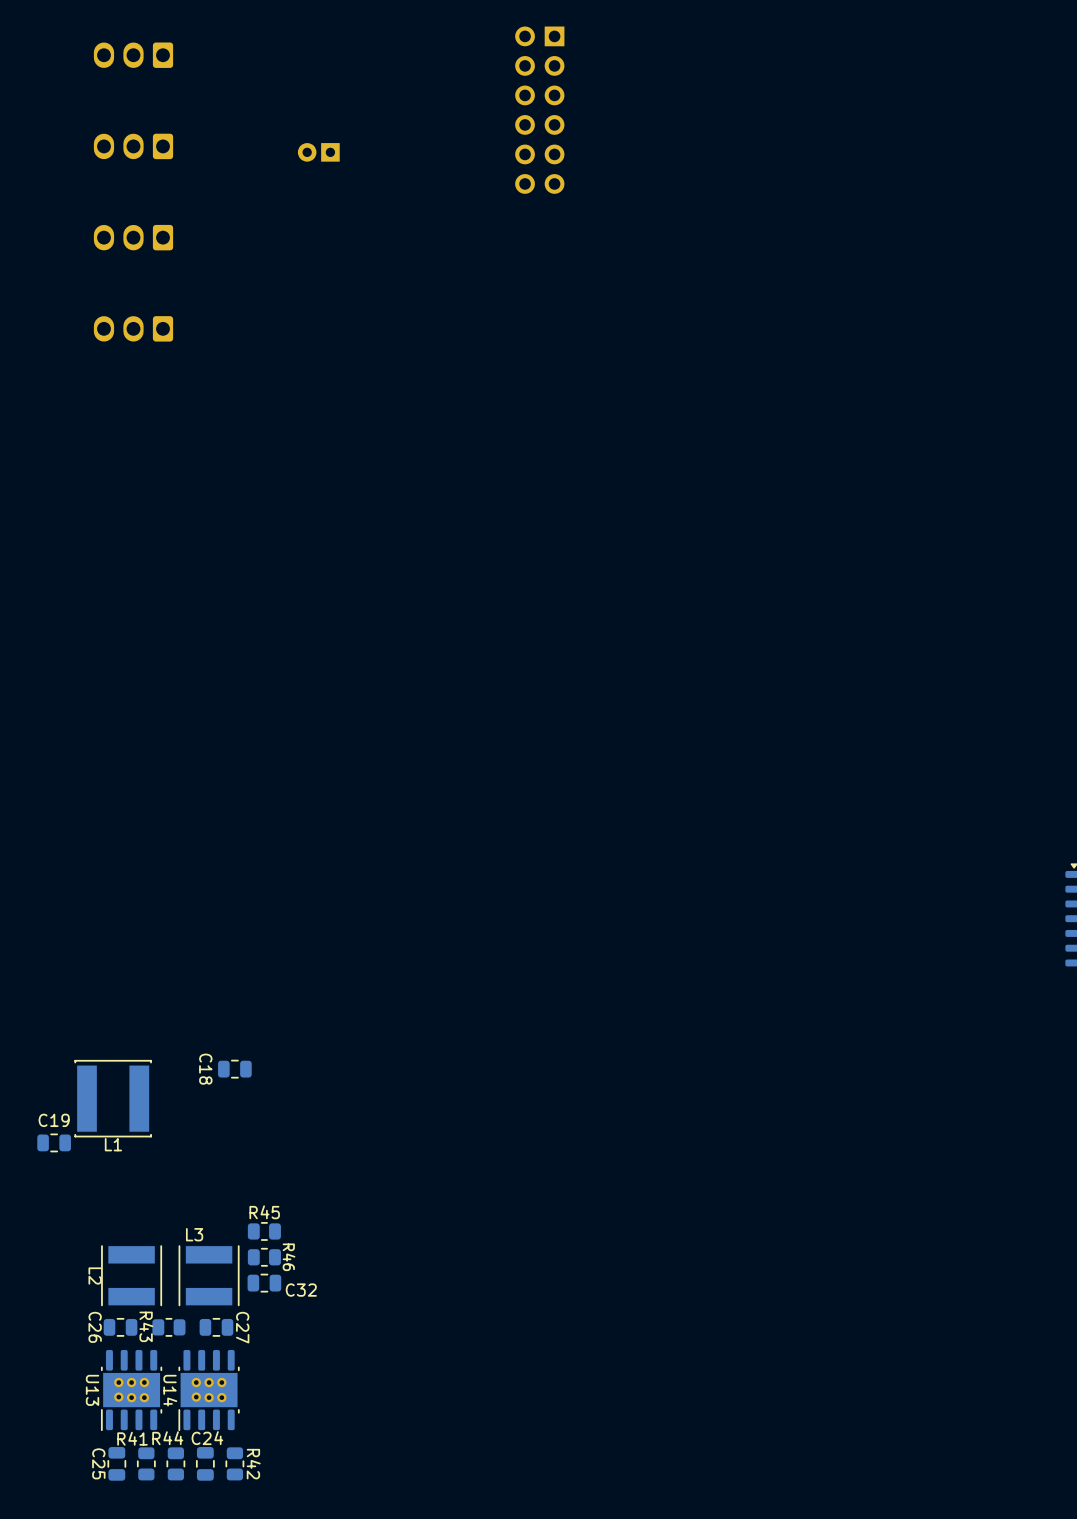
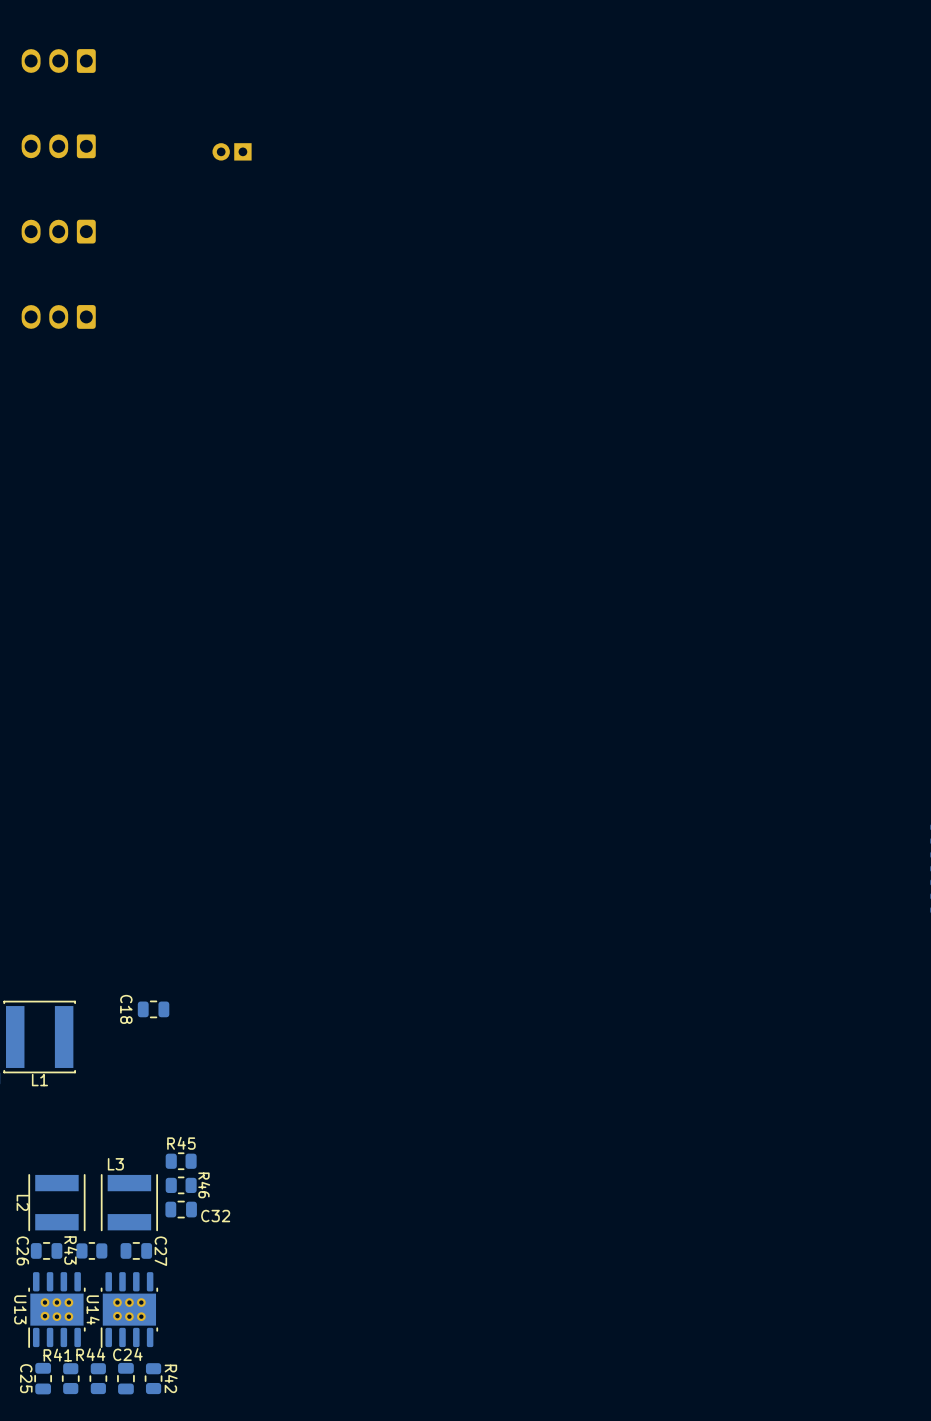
part: (539, 110) -> none

